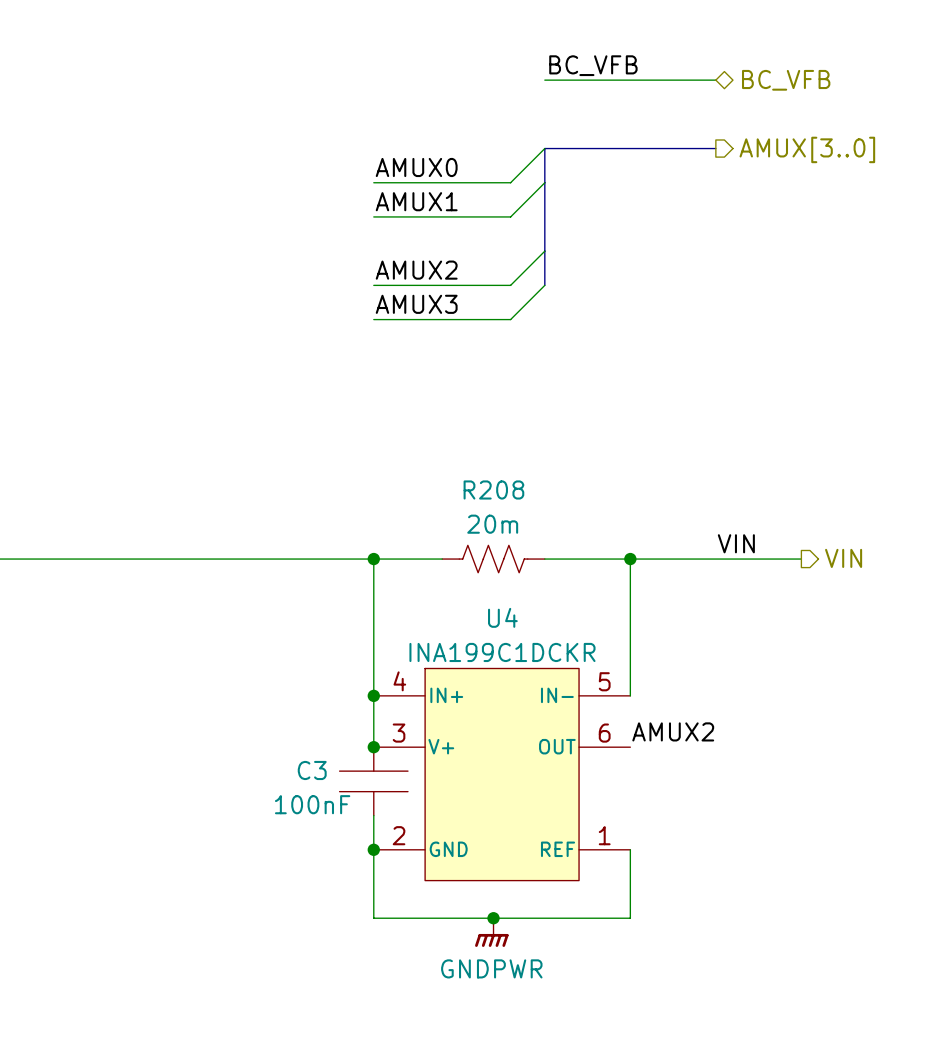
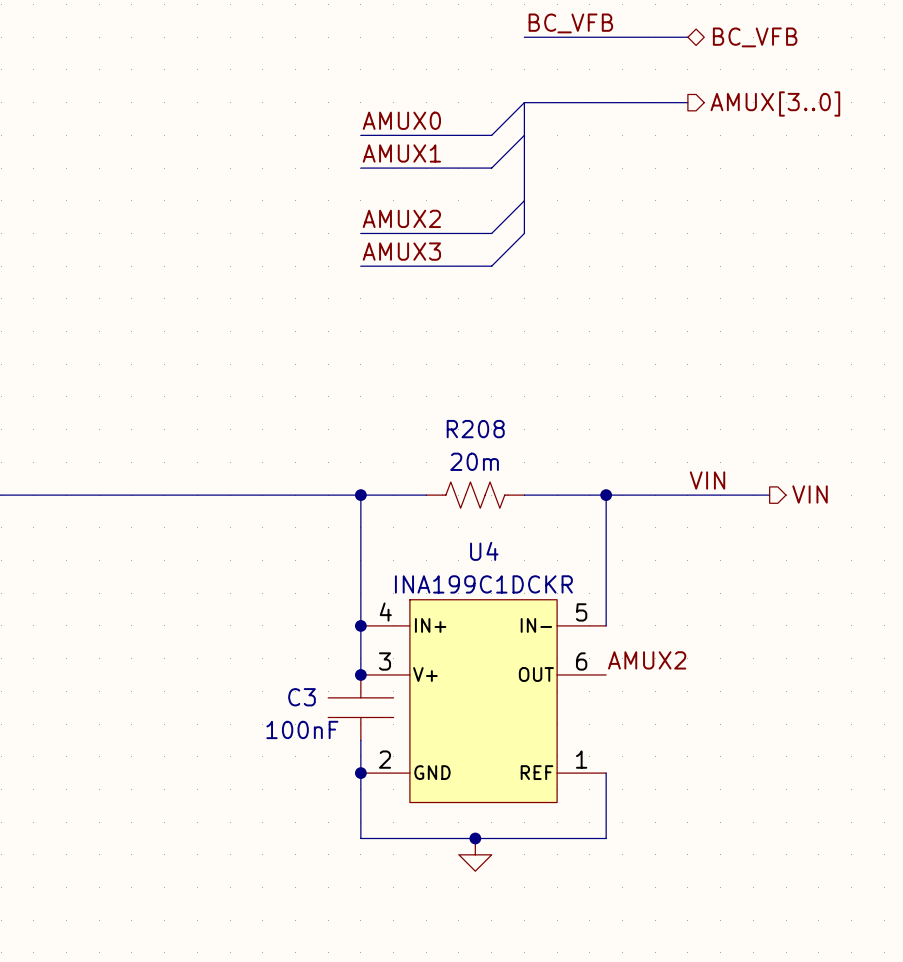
power symbol shape: [475, 918, 509, 947] -> [458, 838, 492, 872]
power symbol text: GNDPWR (491, 968) -> none

